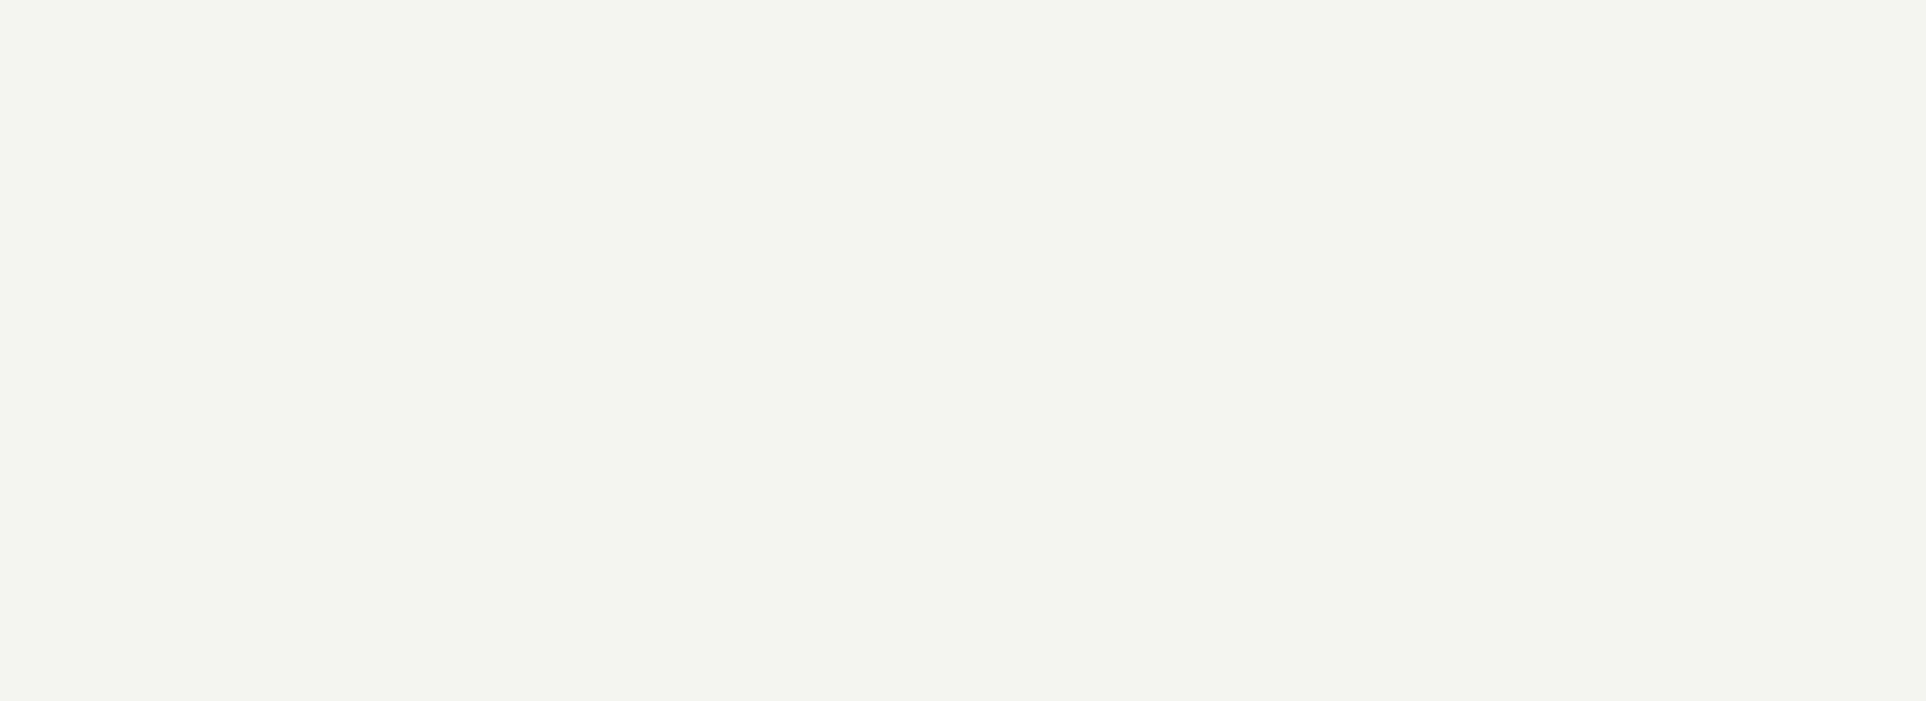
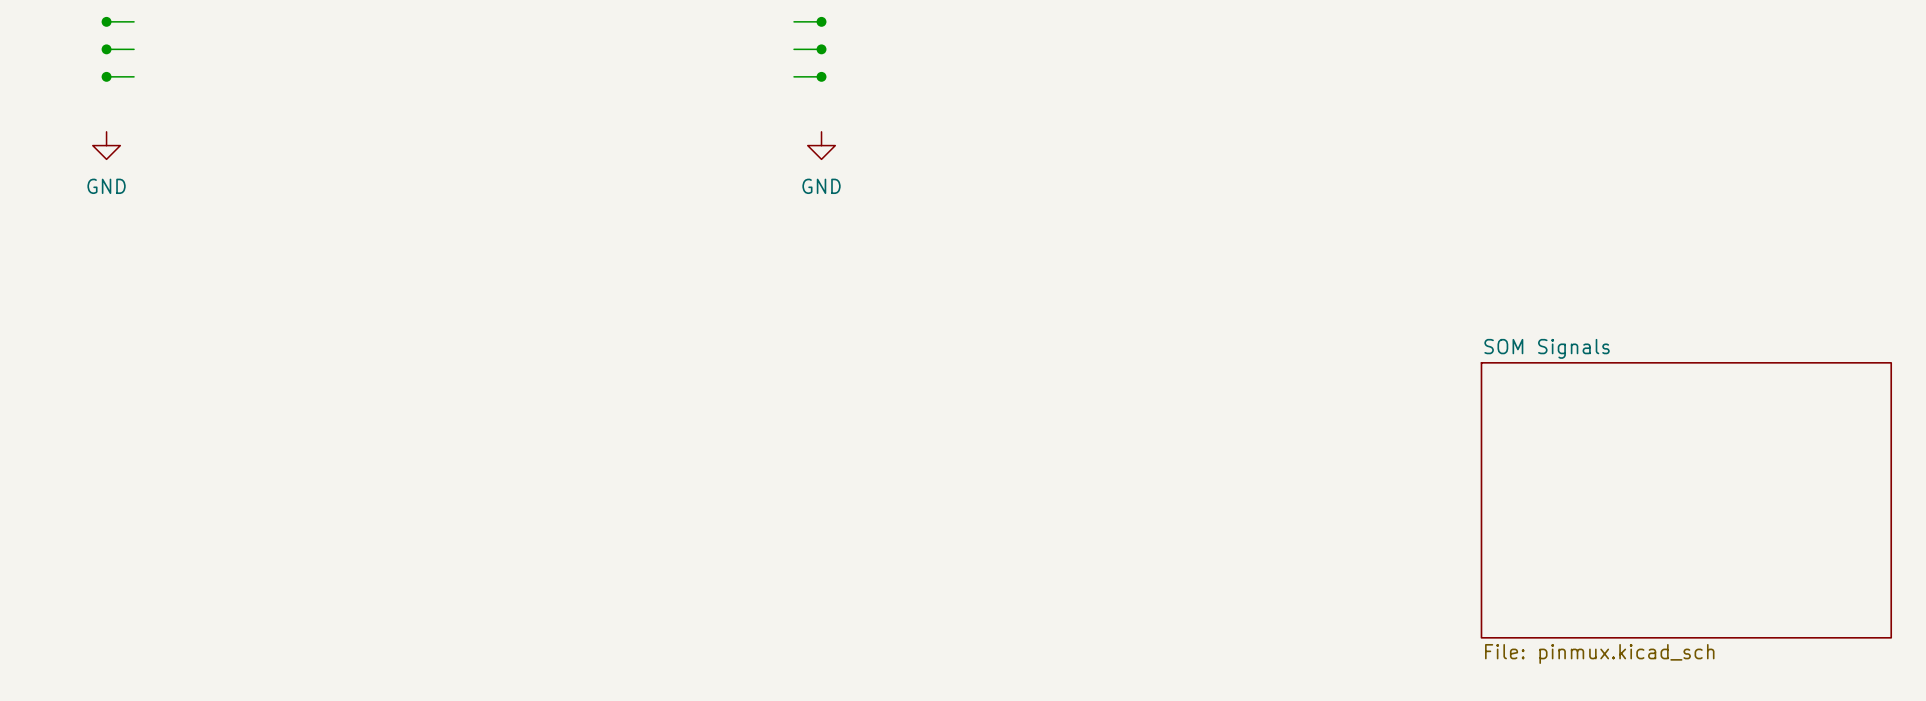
wire: none -> (106, 21) (134, 21)
junction: none -> (106, 21)
wire: none -> (794, 21) (821, 21)
junction: none -> (821, 21)
wire: none -> (106, 49) (134, 49)
junction: none -> (106, 49)
wire: none -> (794, 49) (821, 49)
junction: none -> (821, 49)
wire: none -> (106, 76) (134, 76)
junction: none -> (106, 76)
wire: none -> (794, 76) (821, 76)
junction: none -> (821, 76)
power symbol: none -> GND (106, 145)
power symbol: none -> GND (821, 145)
sheet SOM Signals: none -> File: pinmux.kicad_sch (1686, 500)

